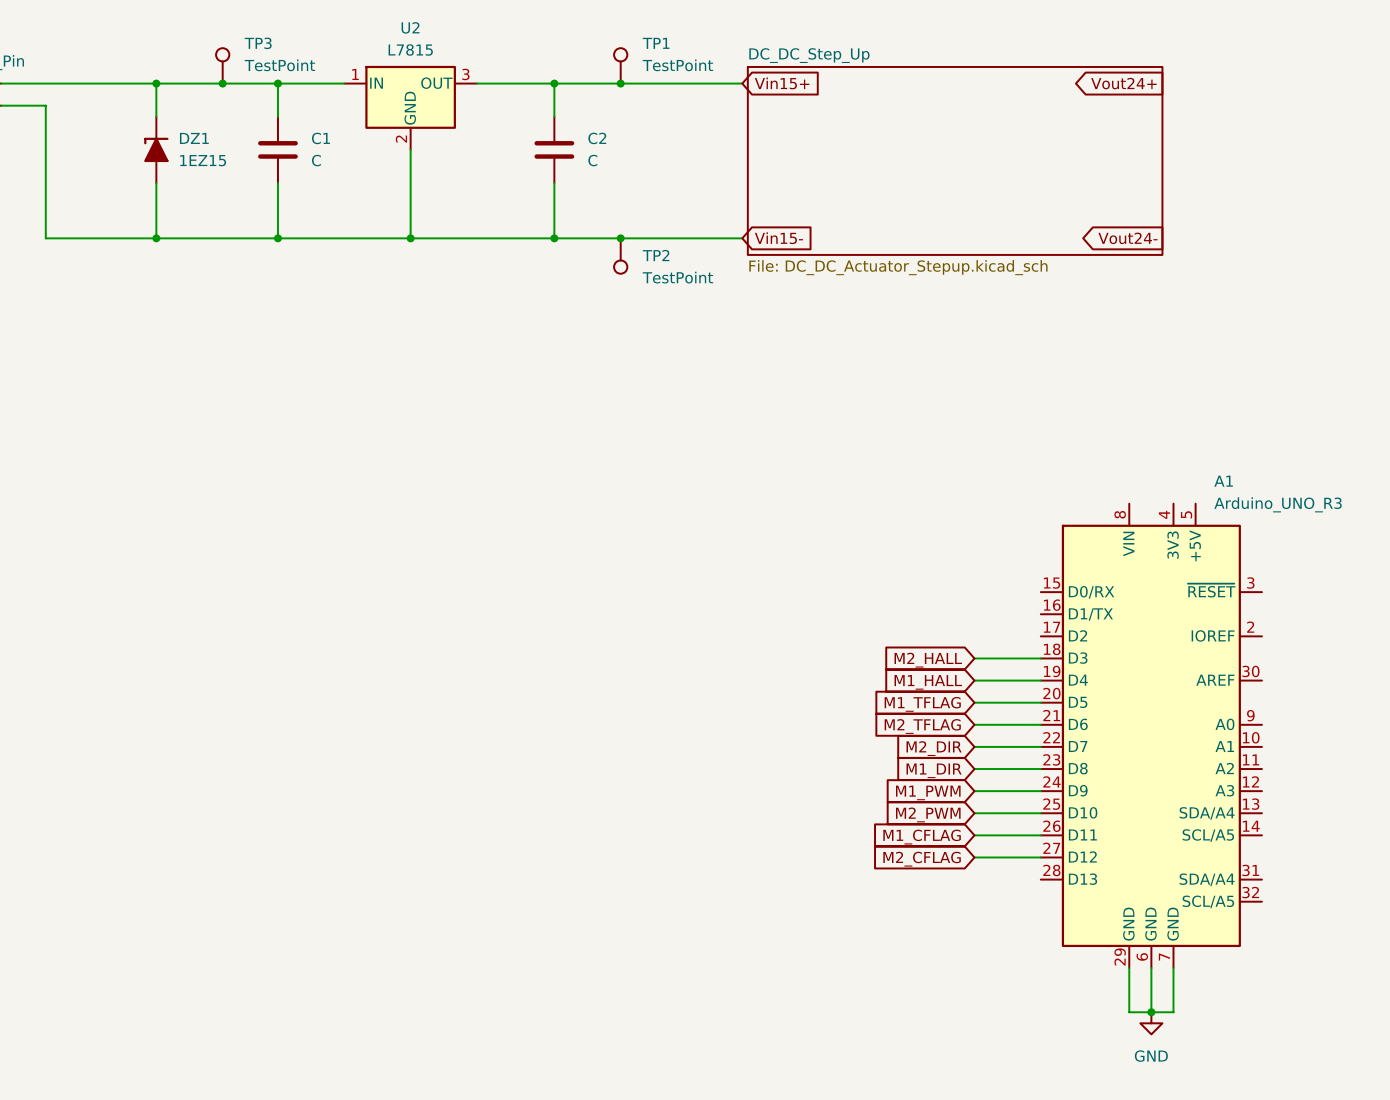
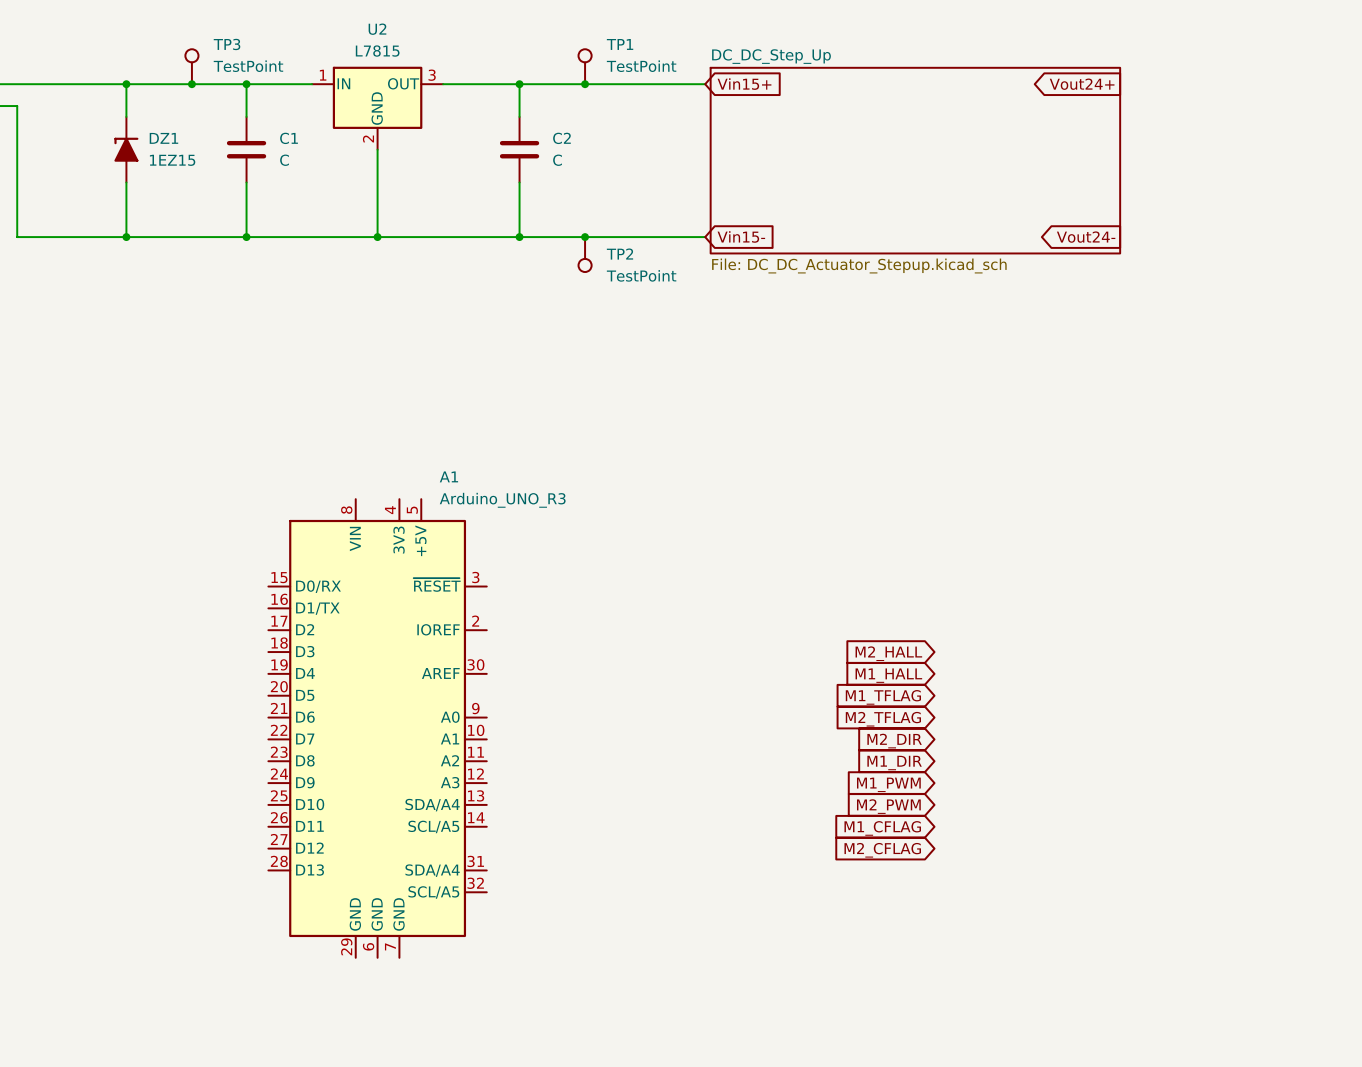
wire: (974, 658) (1040, 658) -> none
wire: (974, 680) (1040, 680) -> none
wire: (974, 702) (1040, 702) -> none
wire: (974, 724) (1040, 724) -> none
A1 position: (1151, 735) -> (377, 728)
wire: (974, 746) (1040, 746) -> none
wire: (974, 769) (1040, 769) -> none
wire: (974, 791) (1040, 791) -> none
wire: (974, 813) (1040, 813) -> none
wire: (974, 835) (1040, 835) -> none
wire: (974, 857) (1040, 857) -> none
wire: (1129, 968) (1129, 1012) (1173, 1012) (1173, 968) -> none
wire: (1151, 968) (1151, 1012) -> none
junction: (1151, 1012) -> none
power symbol: GND (1151, 1023) -> none

